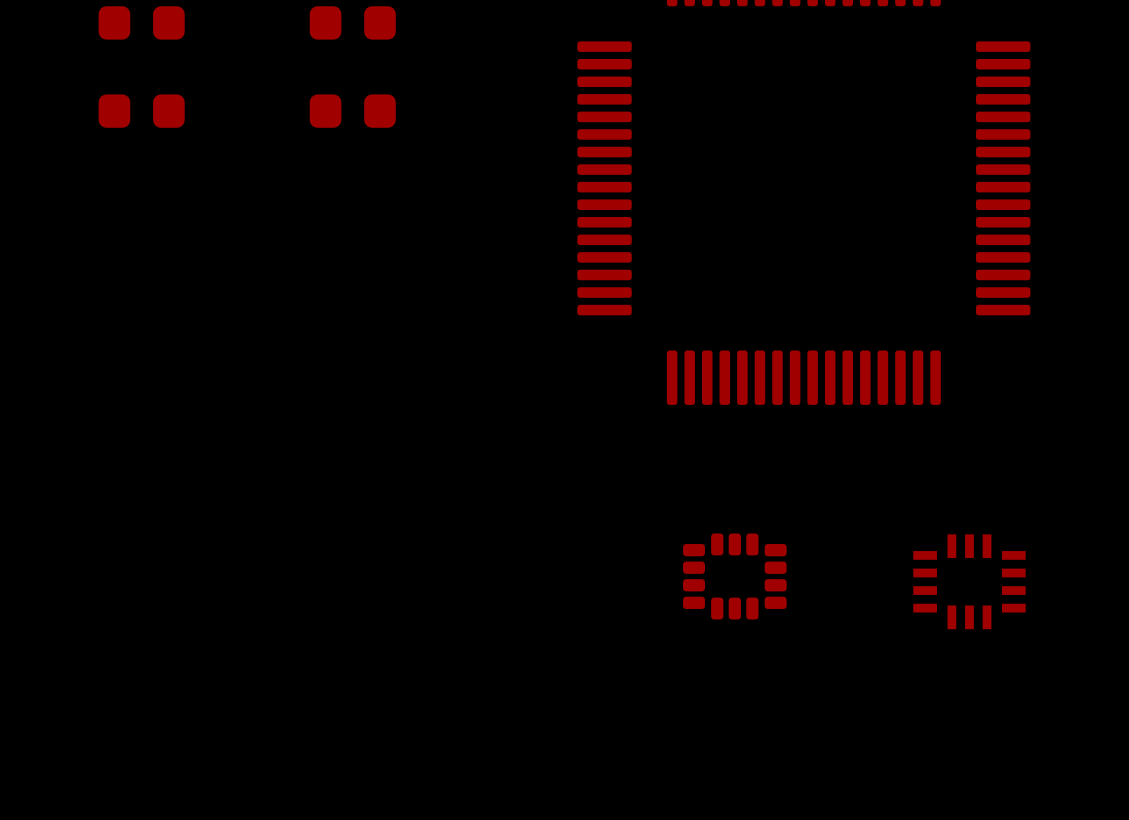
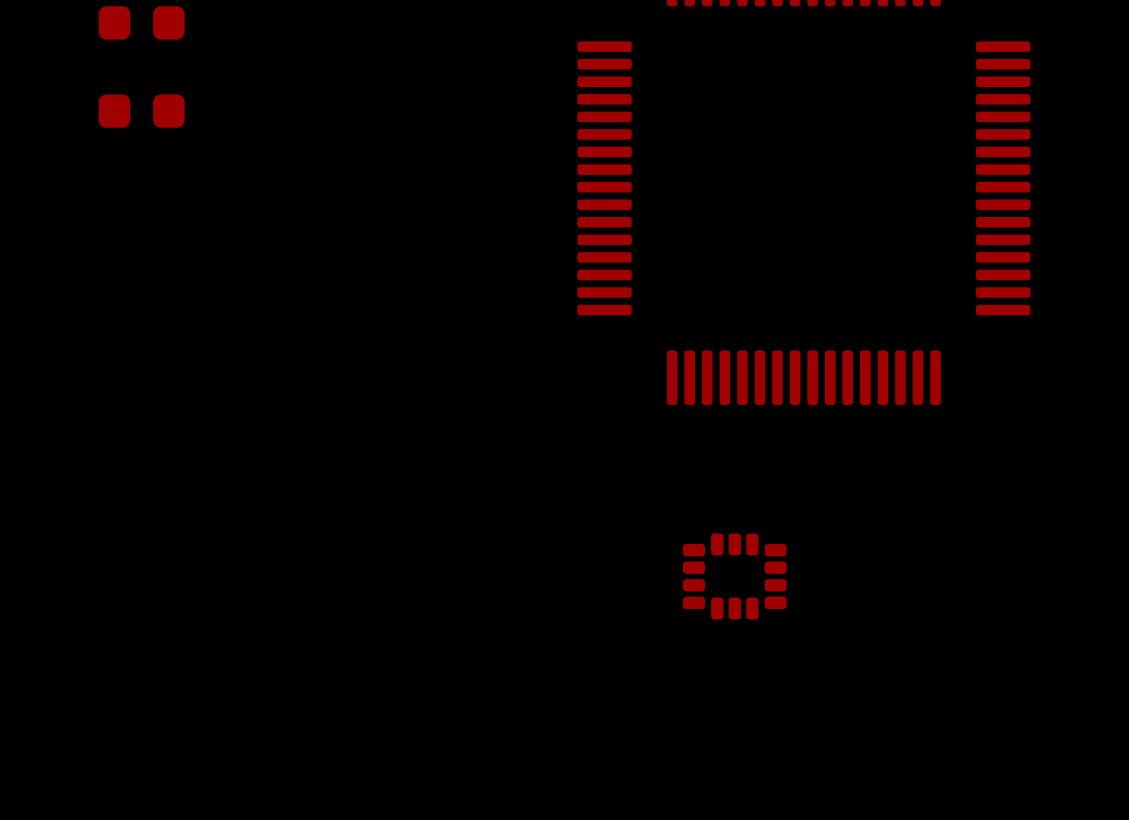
part: (352, 22) -> none
part: (352, 111) -> none
part: (969, 581) -> none

